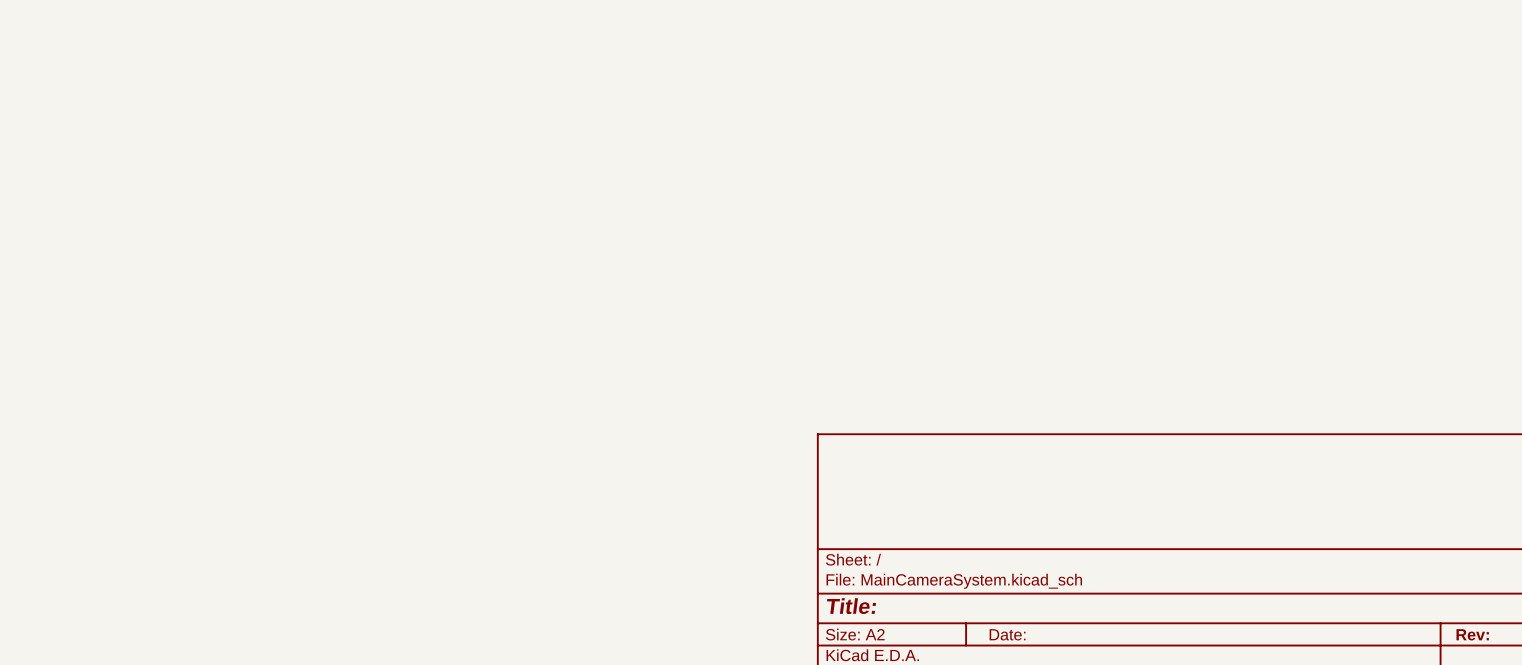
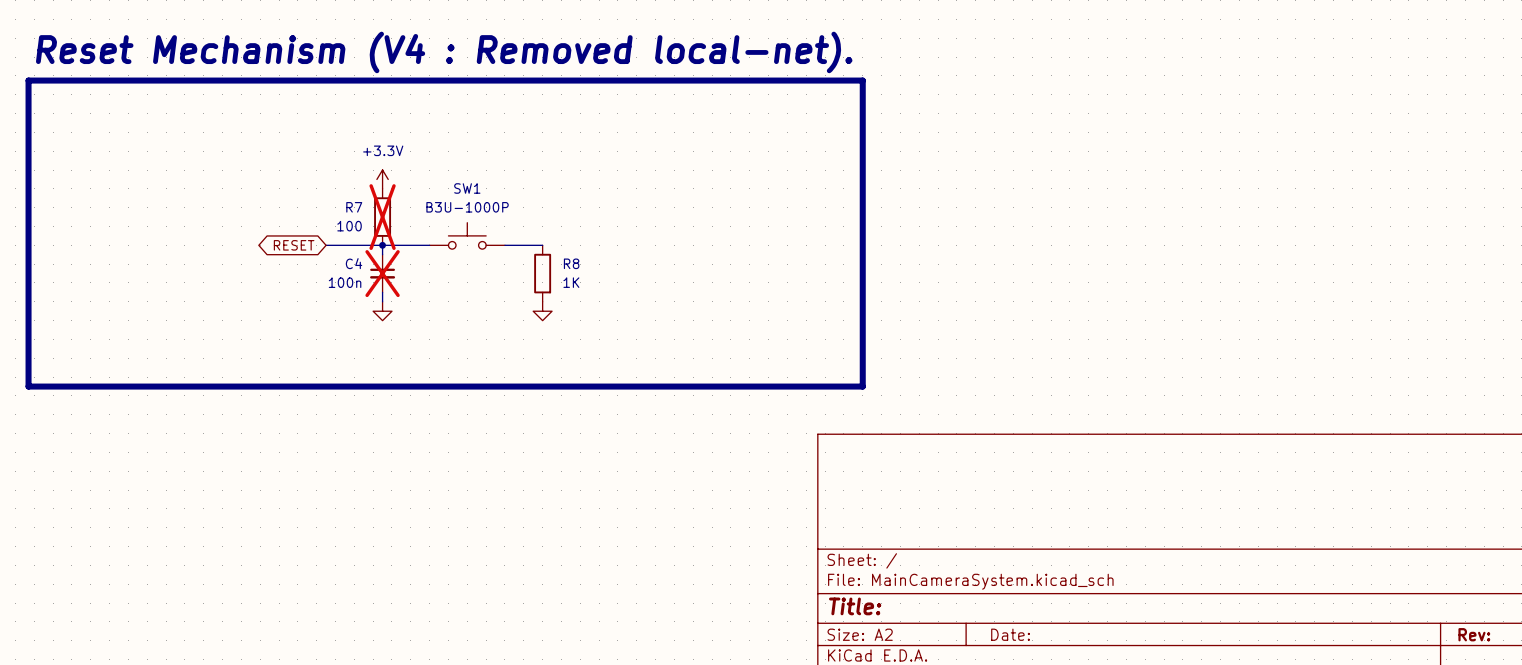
text: none -> Reset Mechanism (V4 : Removed local-net). (444, 52)
line: none -> (28, 80) (862, 80) (862, 386) (28, 386) (28, 80)
power symbol: none -> +3.3V (382, 179)
R7: none -> 100 (382, 217)
SW1: none -> B3U-1000P (467, 235)
global label: none -> RESET (294, 245)
wire: none -> (326, 245) (429, 245)
wire: none -> (382, 245) (382, 254)
junction: none -> (382, 245)
wire: none -> (504, 245) (542, 245)
C4: none -> 100n (382, 273)
R8: none -> 1K (542, 273)
wire: none -> (382, 292) (382, 301)
power symbol: none -> (382, 311)
power symbol: none -> (542, 311)

